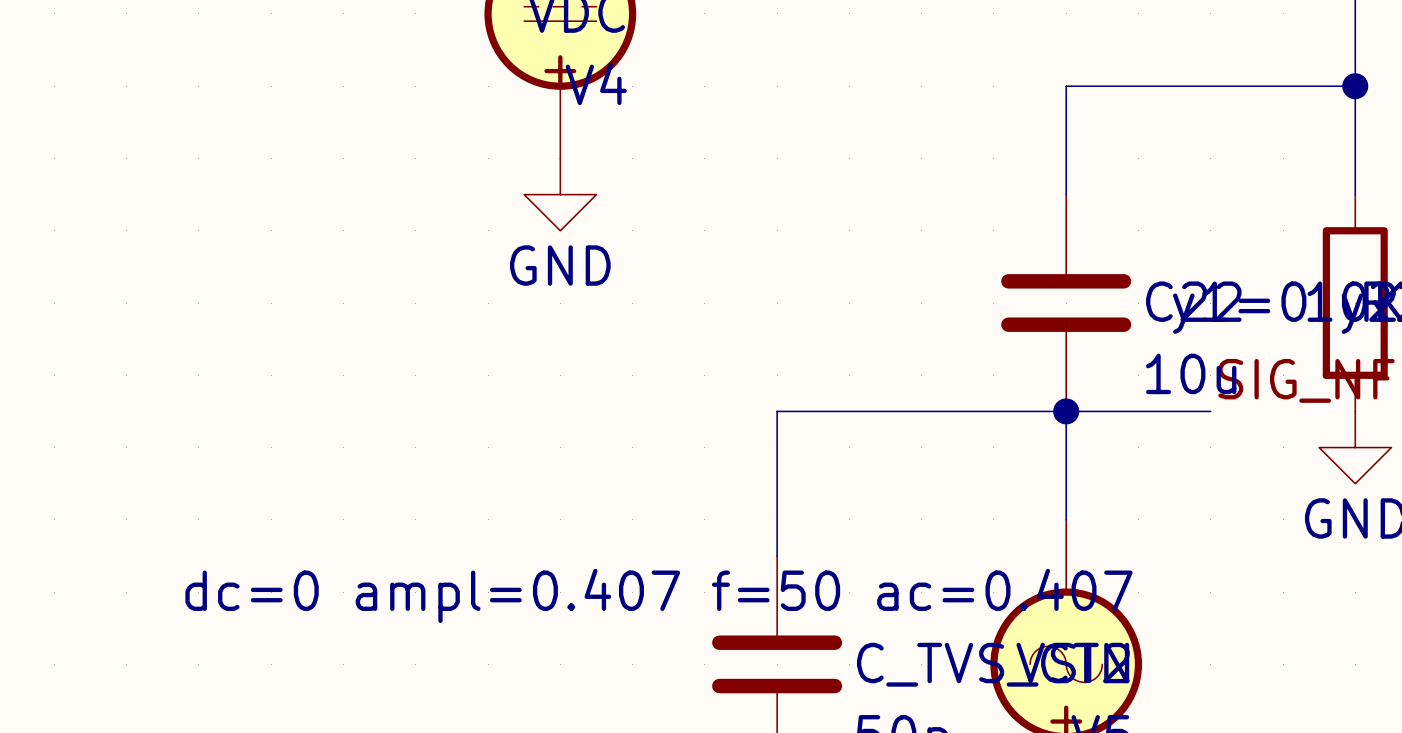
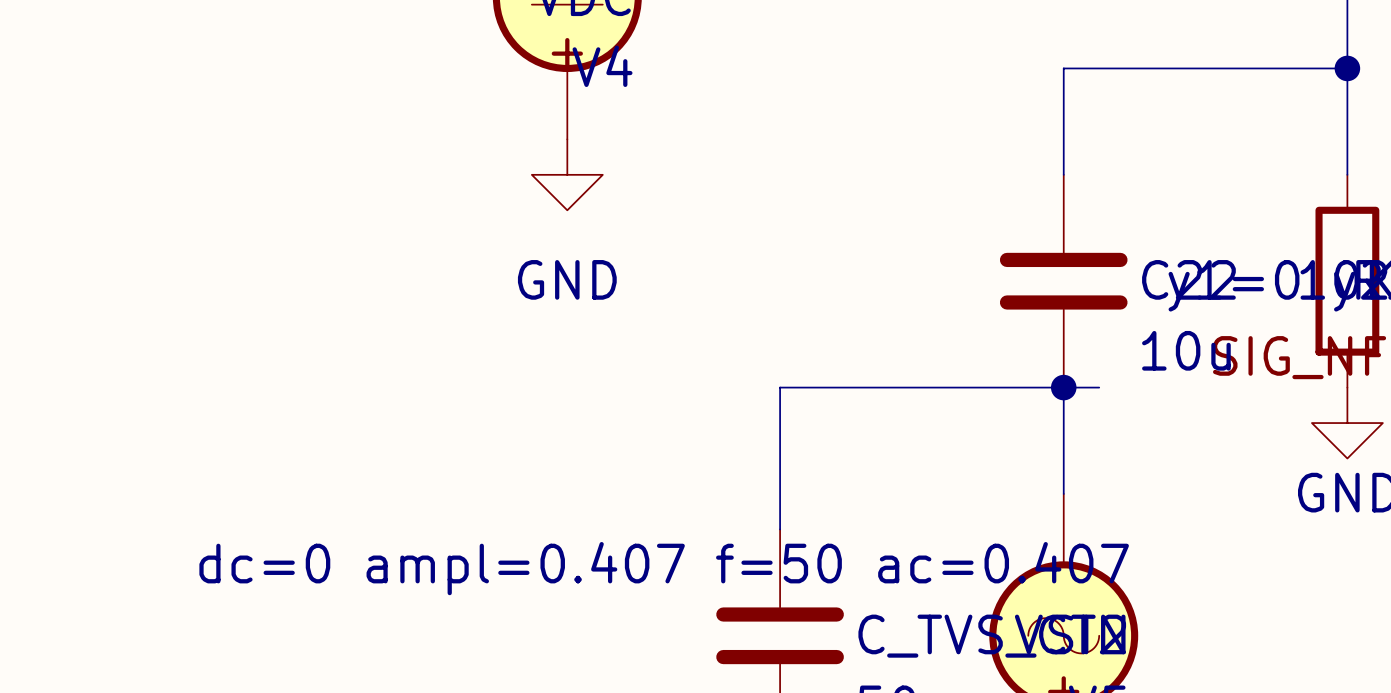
power symbol text position: GND (560, 265) -> GND (567, 279)
wire: (1102, 411) (1210, 411) -> none

